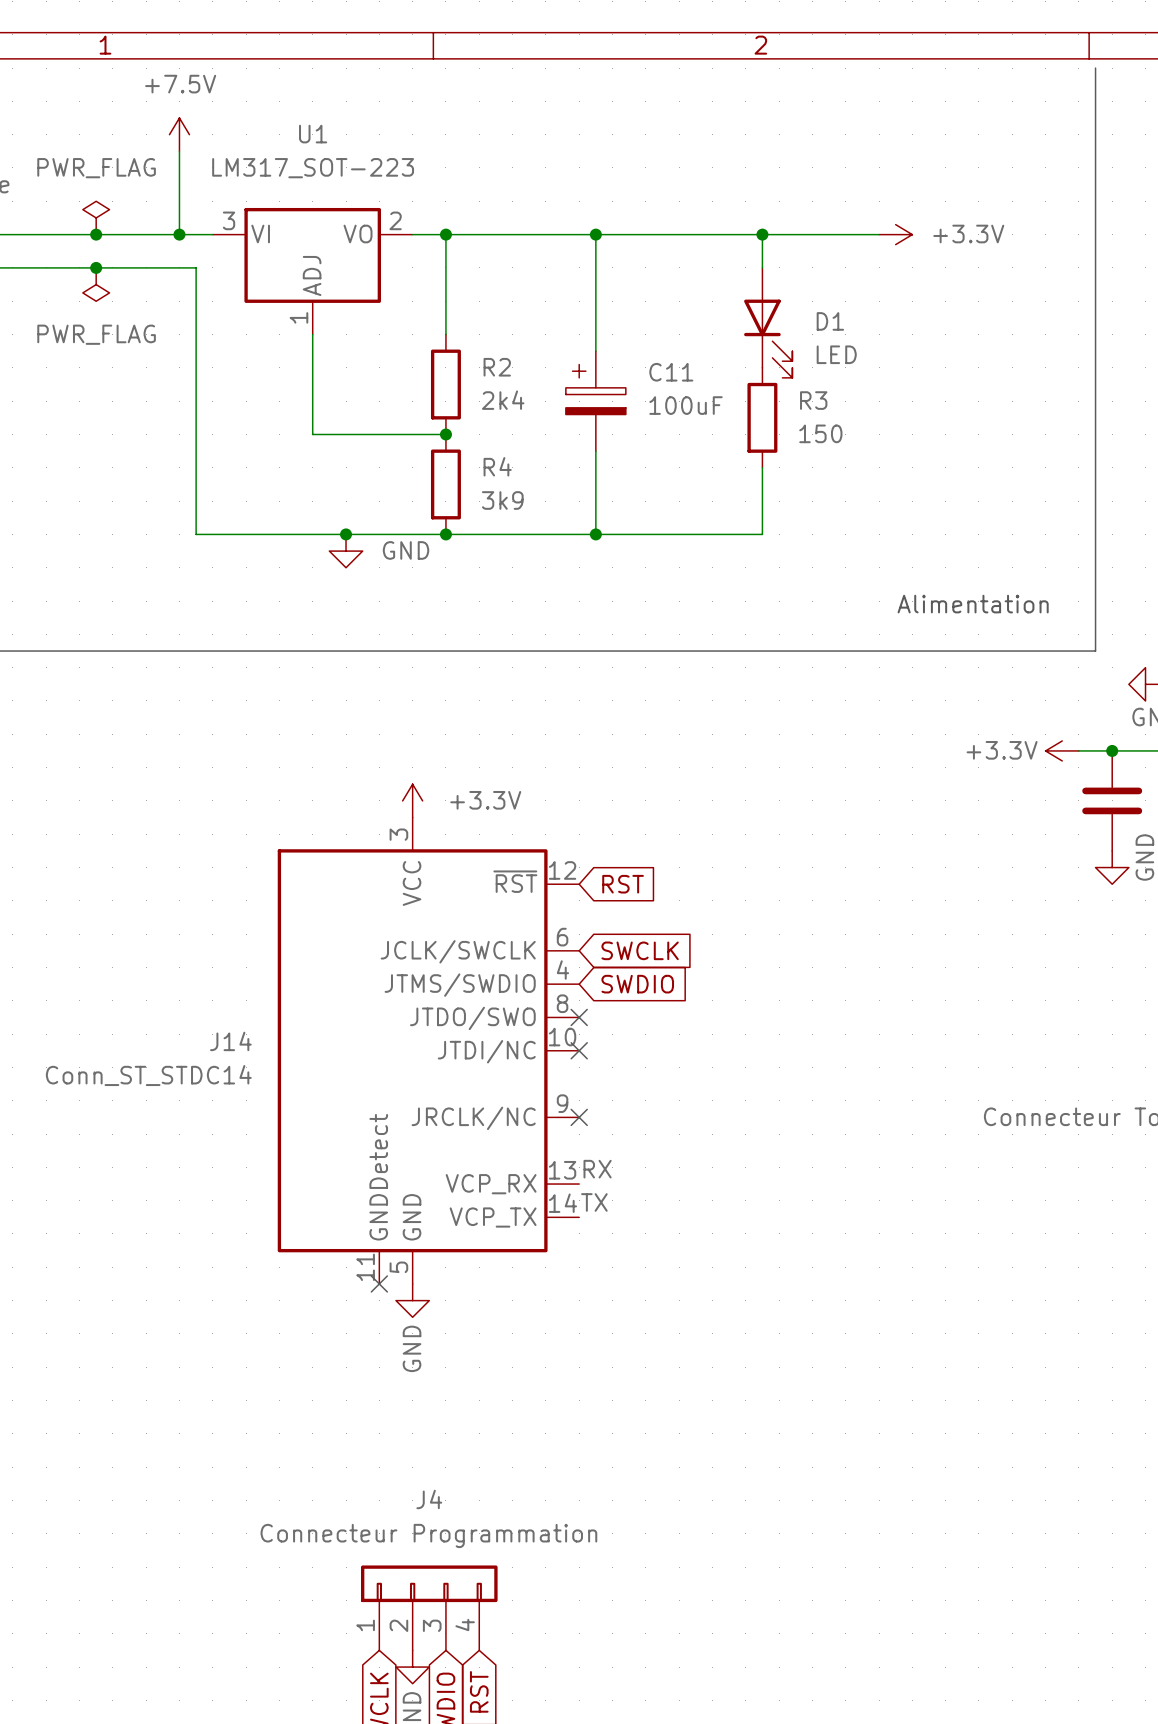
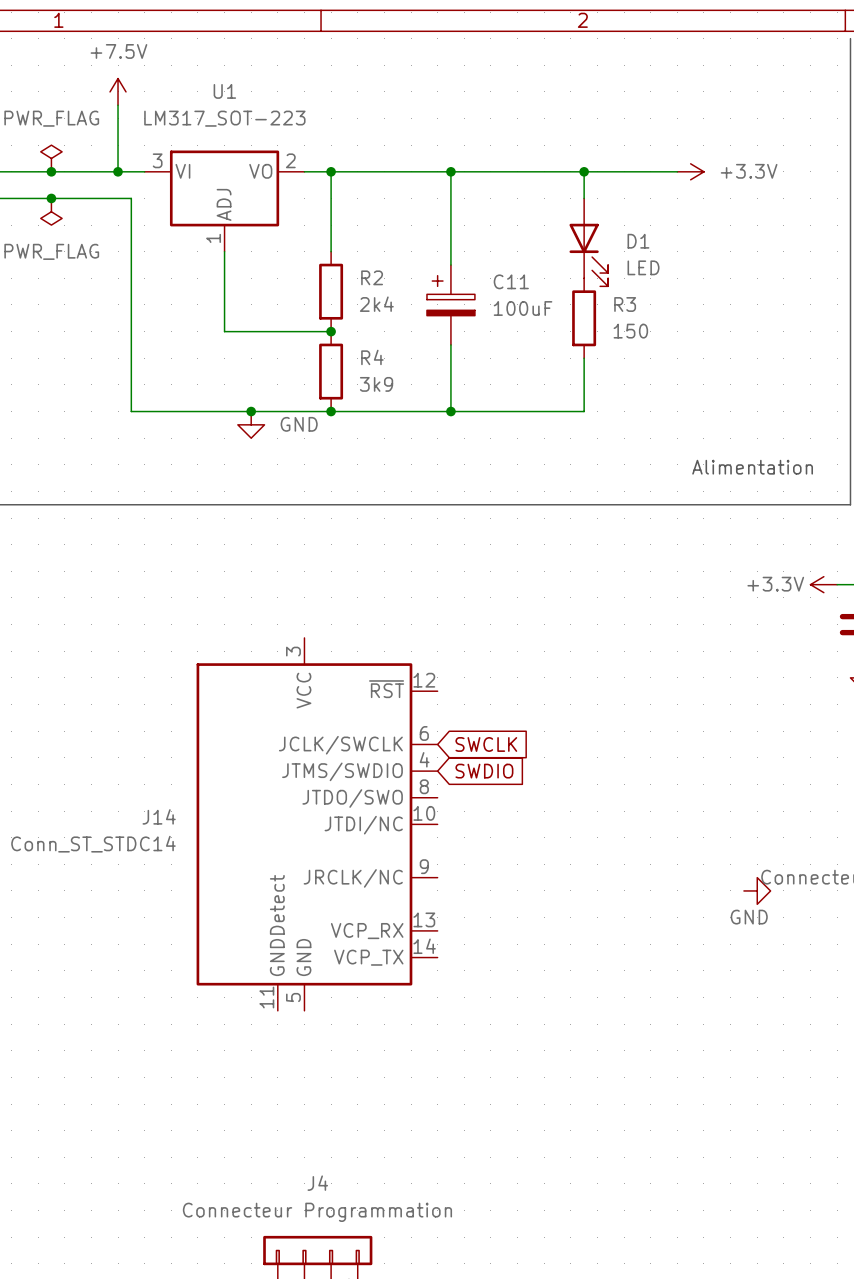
power symbol: +3.3V (412, 800) -> none
global label: RST (623, 884) -> none
no-connect mark: (579, 1017) -> none
no-connect mark: (579, 1050) -> none
no-connect mark: (579, 1117) -> none
power symbol: none -> GND (757, 890)
label: RX (597, 1169) -> none
label: TX (594, 1202) -> none
no-connect mark: (379, 1283) -> none
power symbol: GND (412, 1300) -> none

